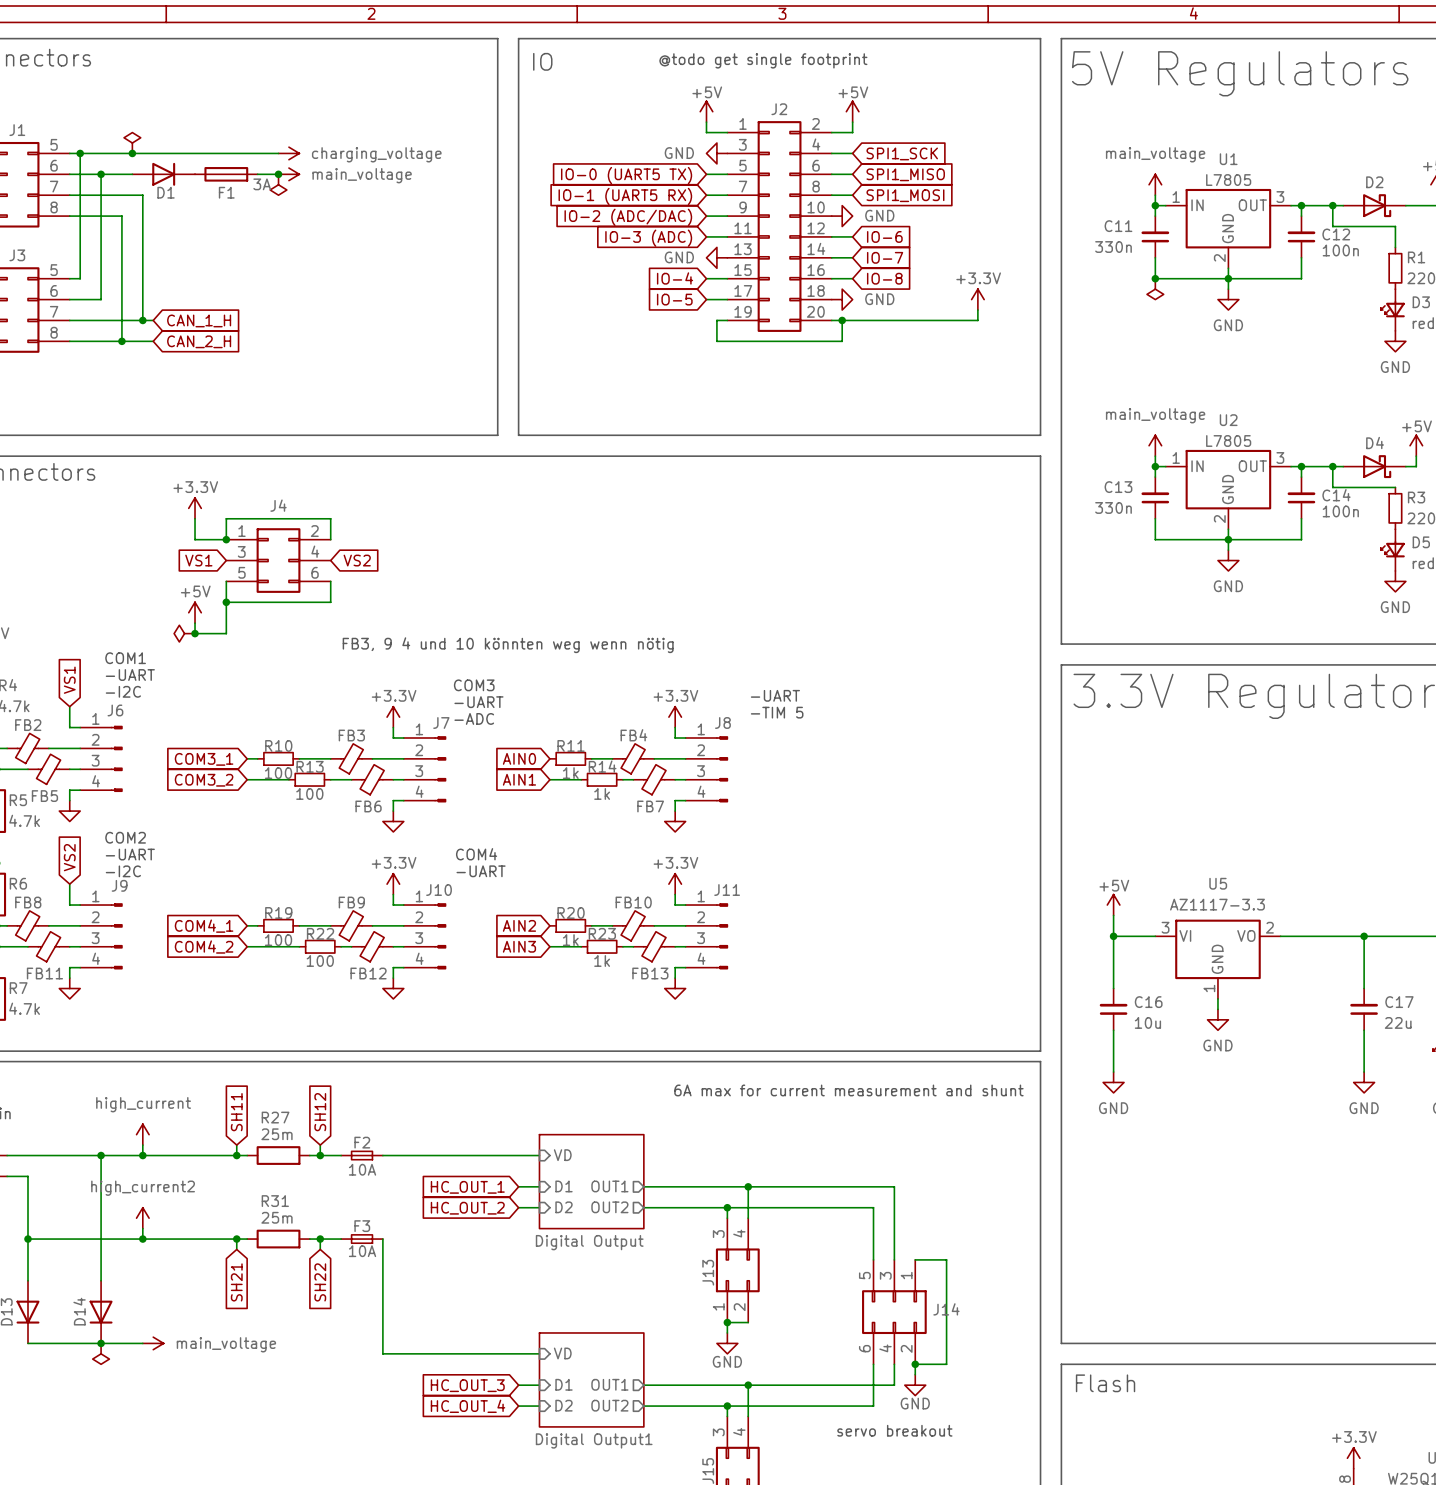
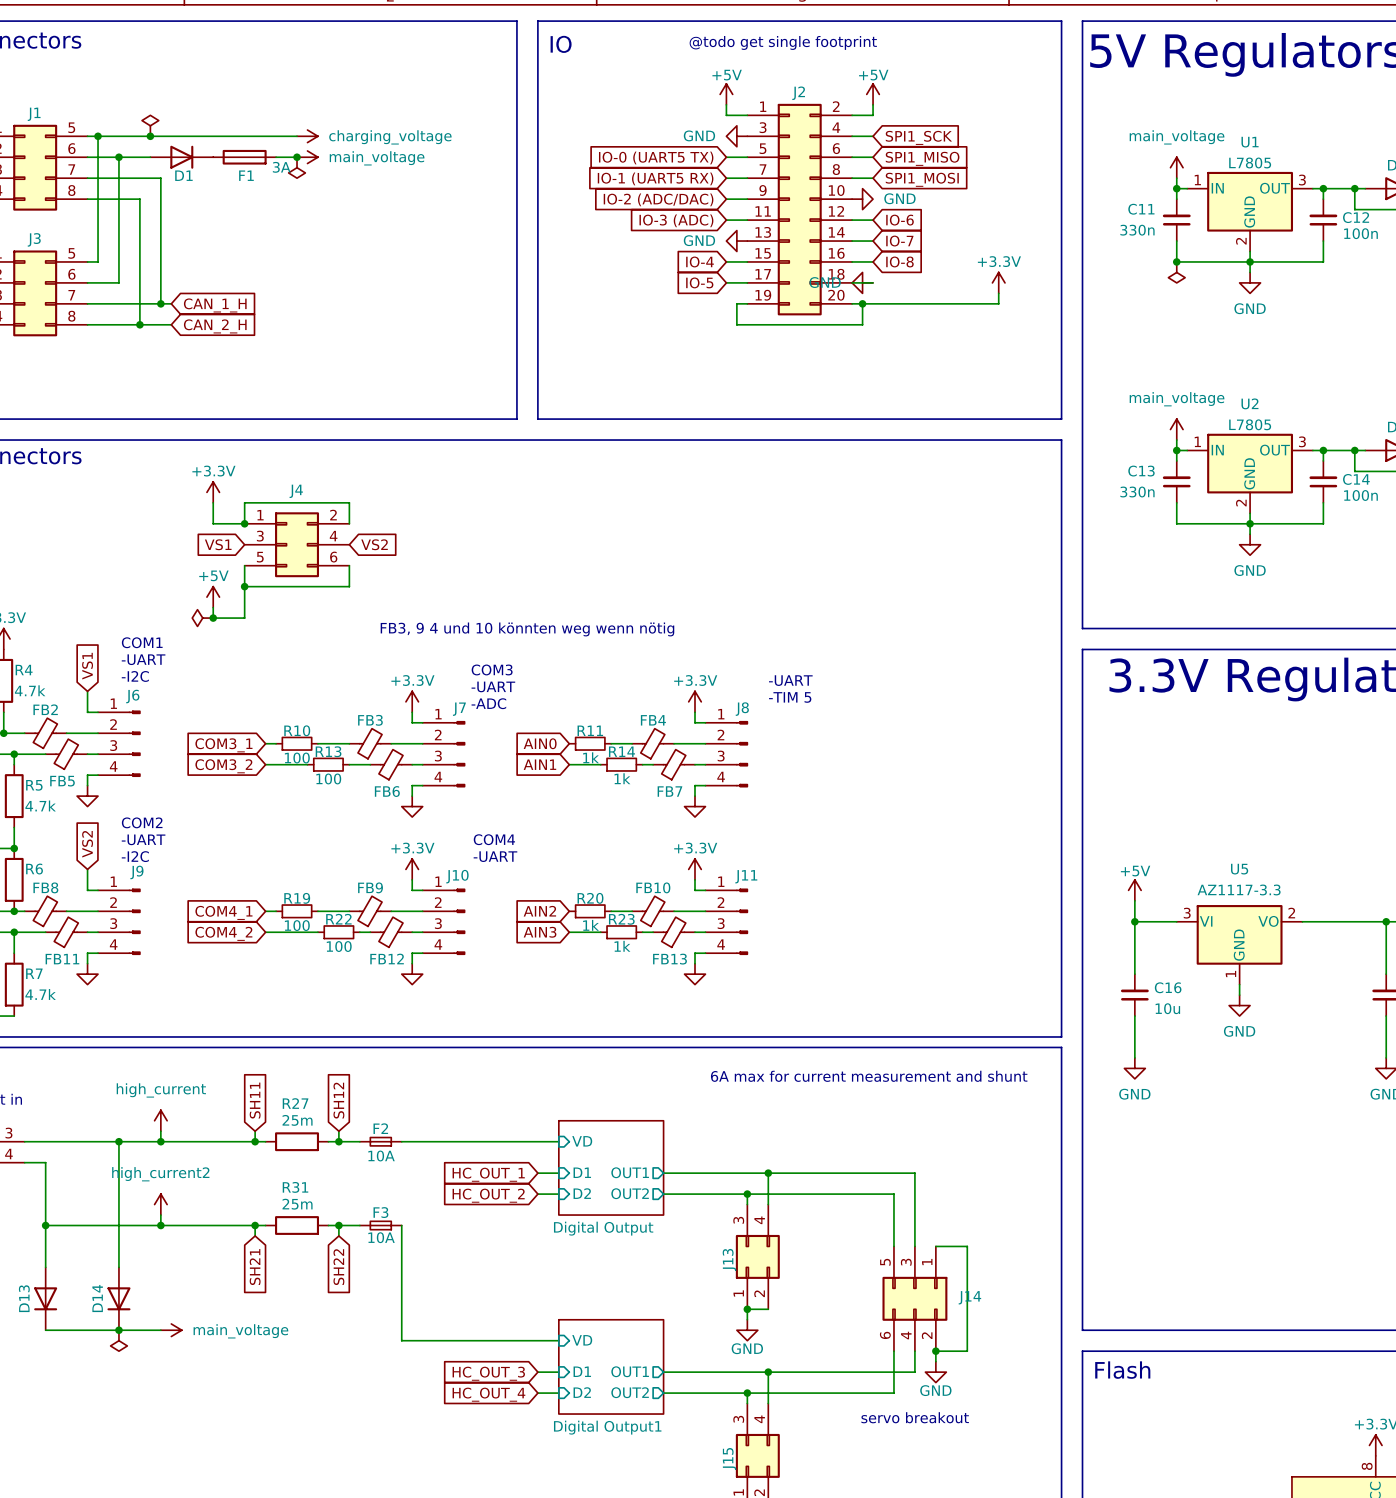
power symbol rotation: 0° (842, 299) -> 180° (862, 282)

